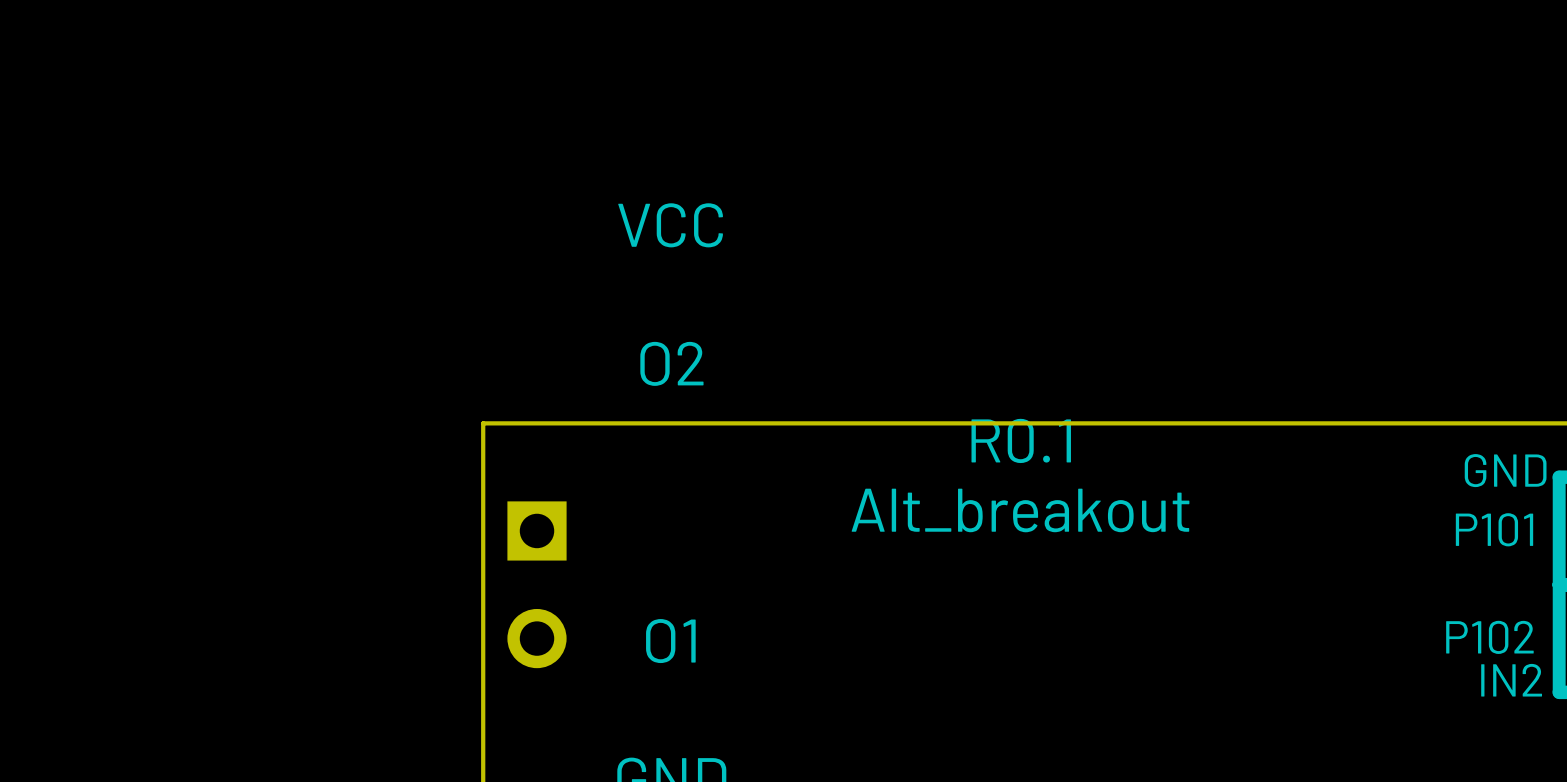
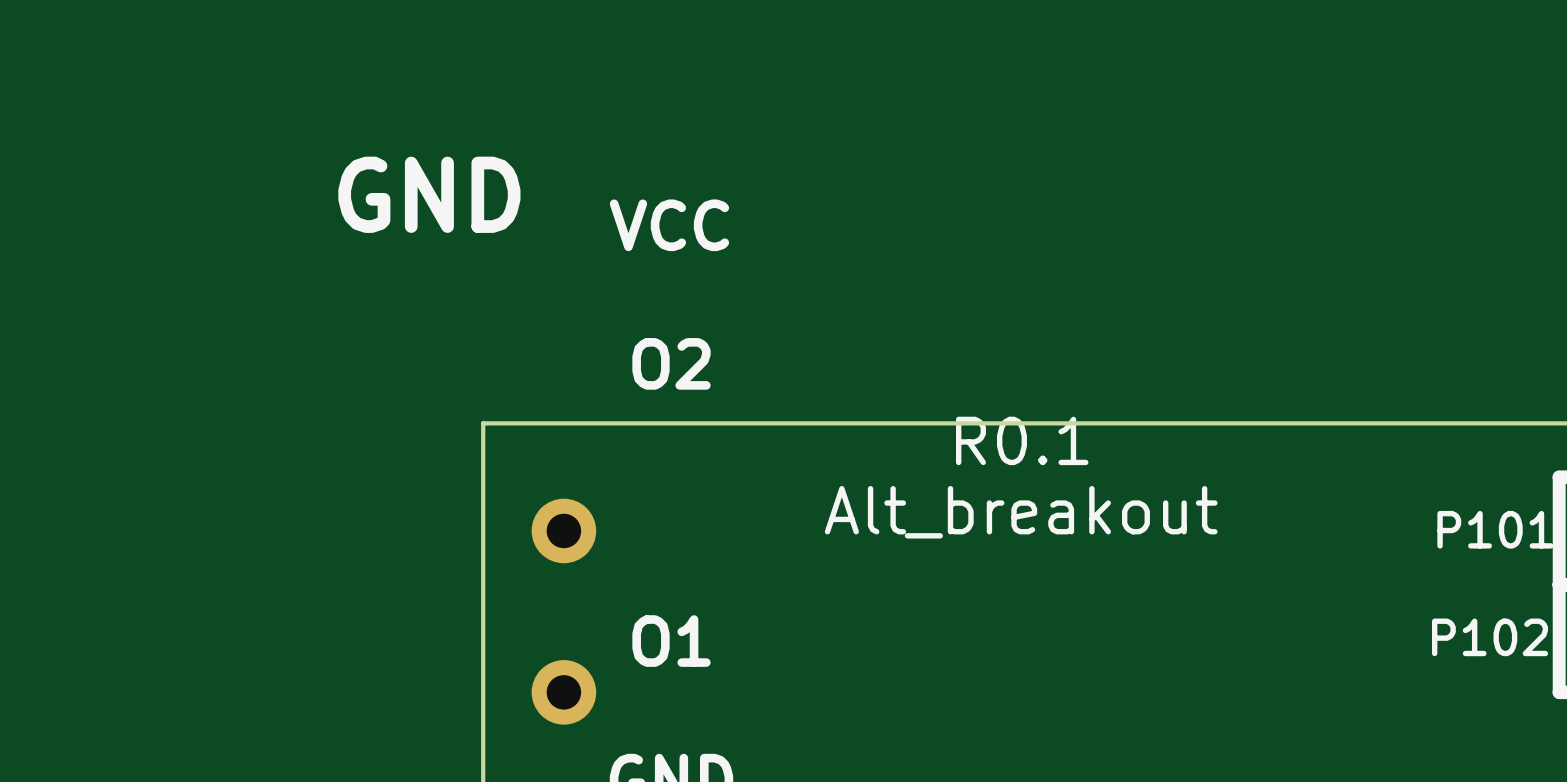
text: none -> GND (429, 194)
text: GND (1505, 470) -> none
part footprint: [507, 501, 567, 669] -> [531, 498, 597, 725]
text: IN2 (1511, 680) -> none

